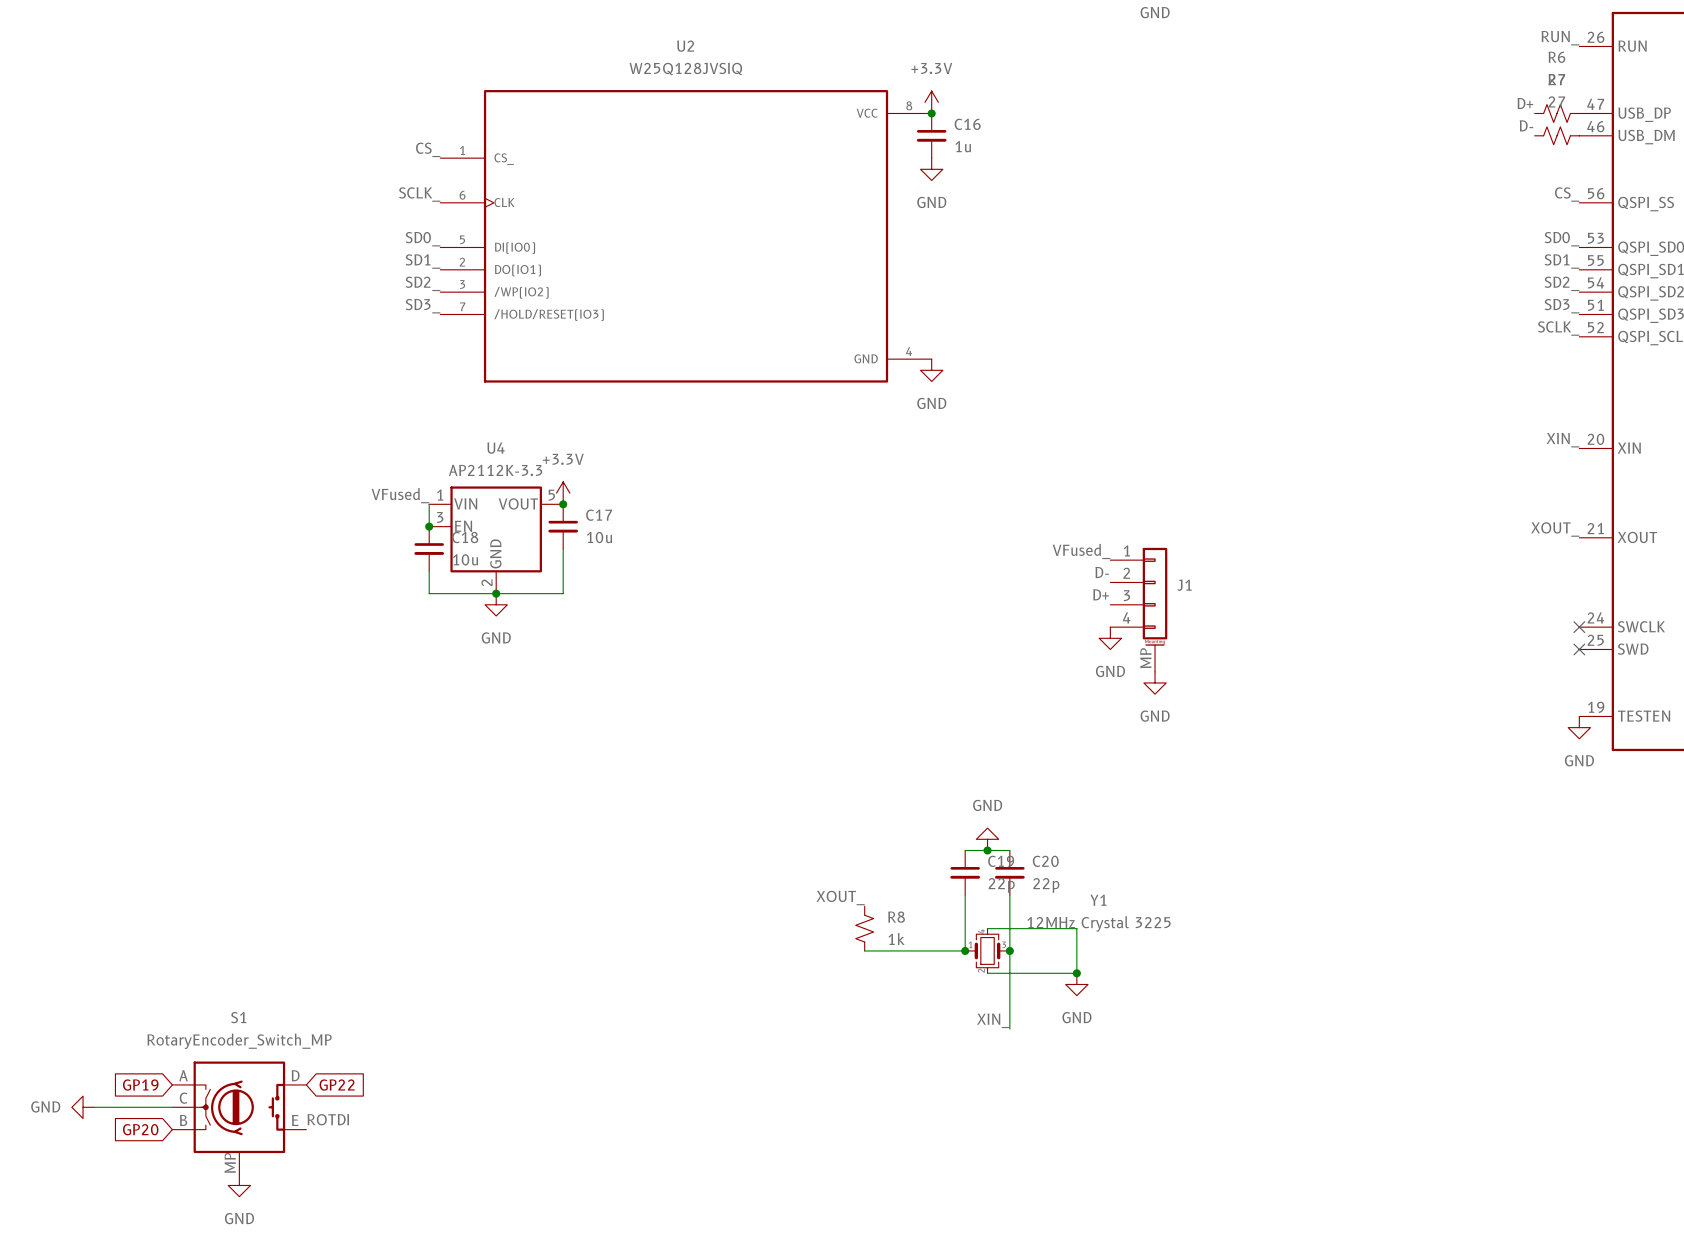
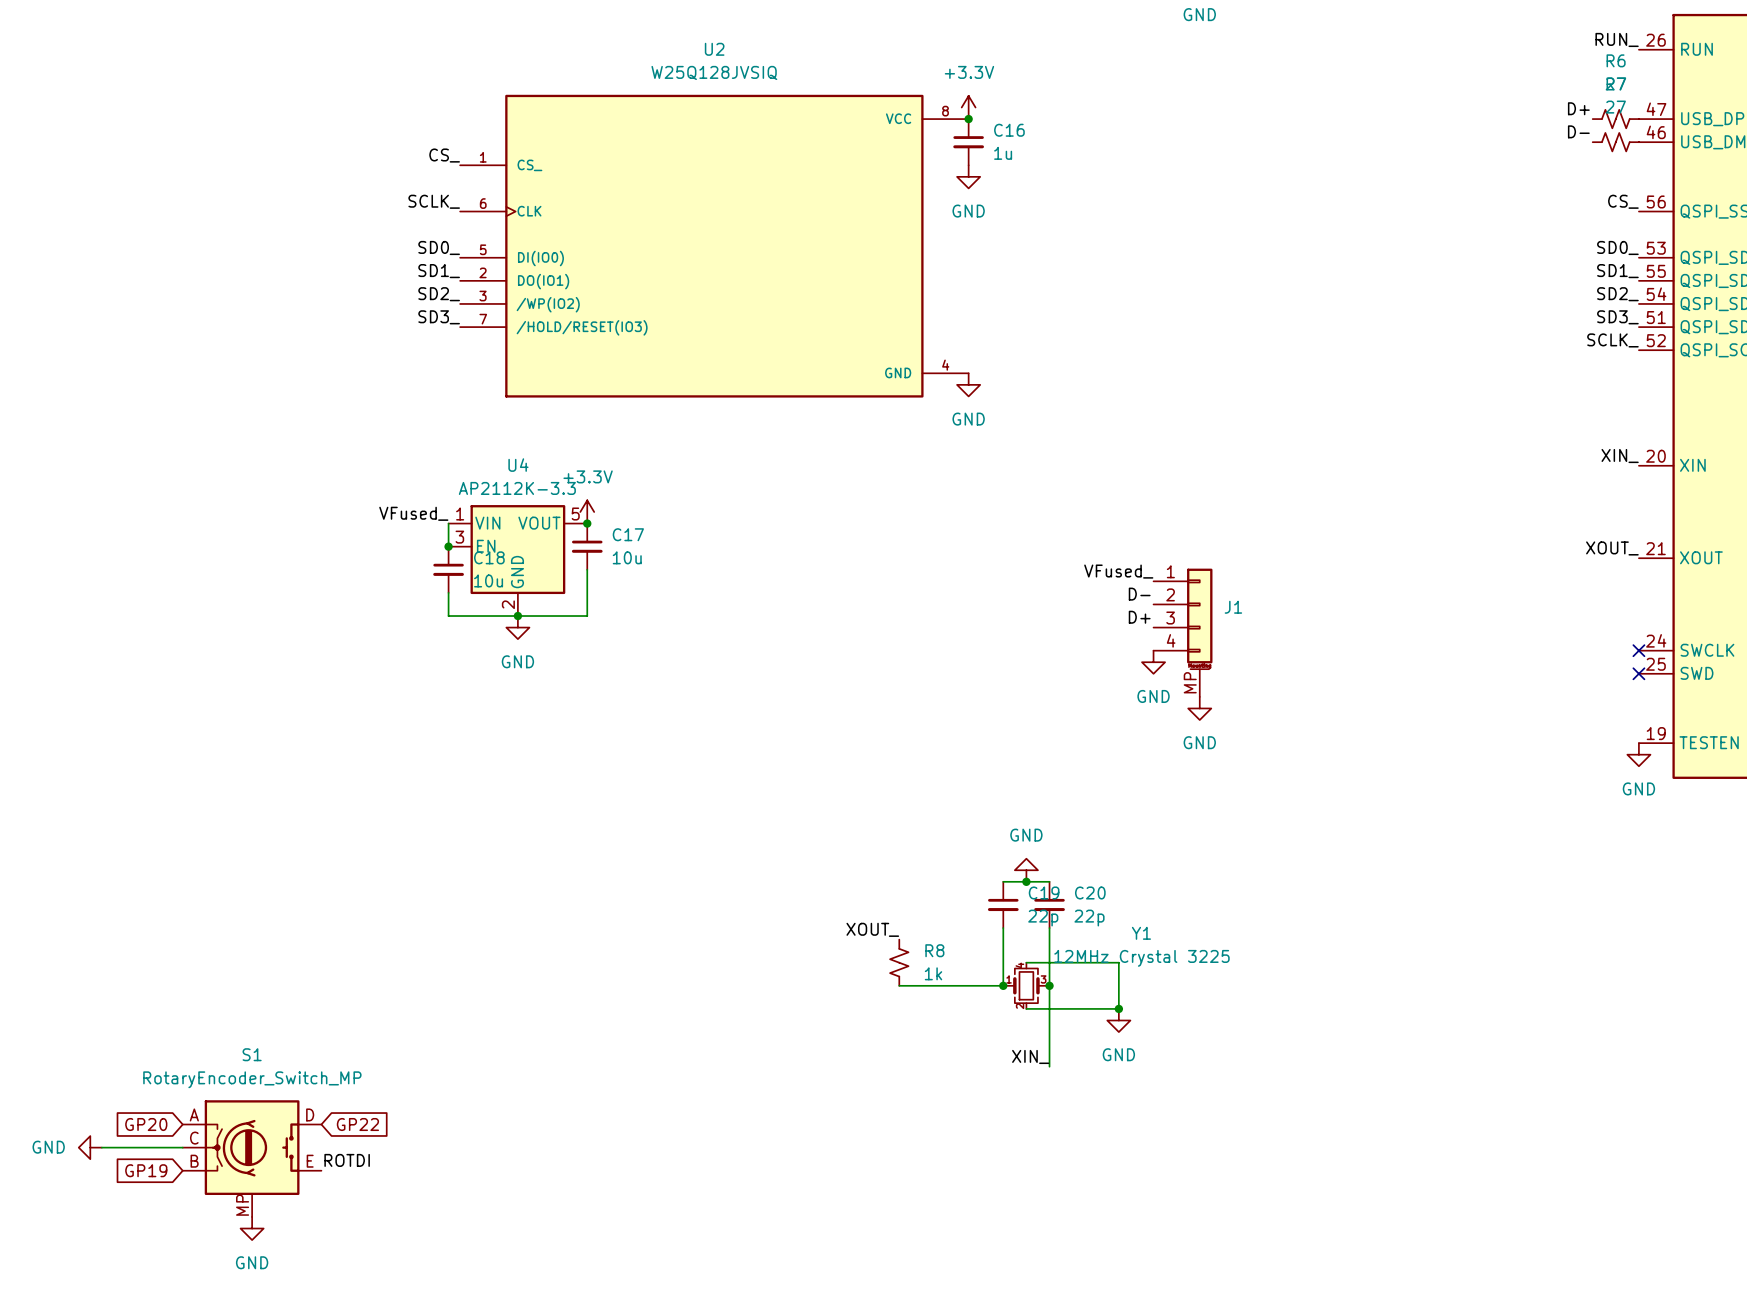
global label: GP19 (140, 1085) -> GP20 (146, 1124)
global label: GP20 (140, 1129) -> GP19 (146, 1170)

